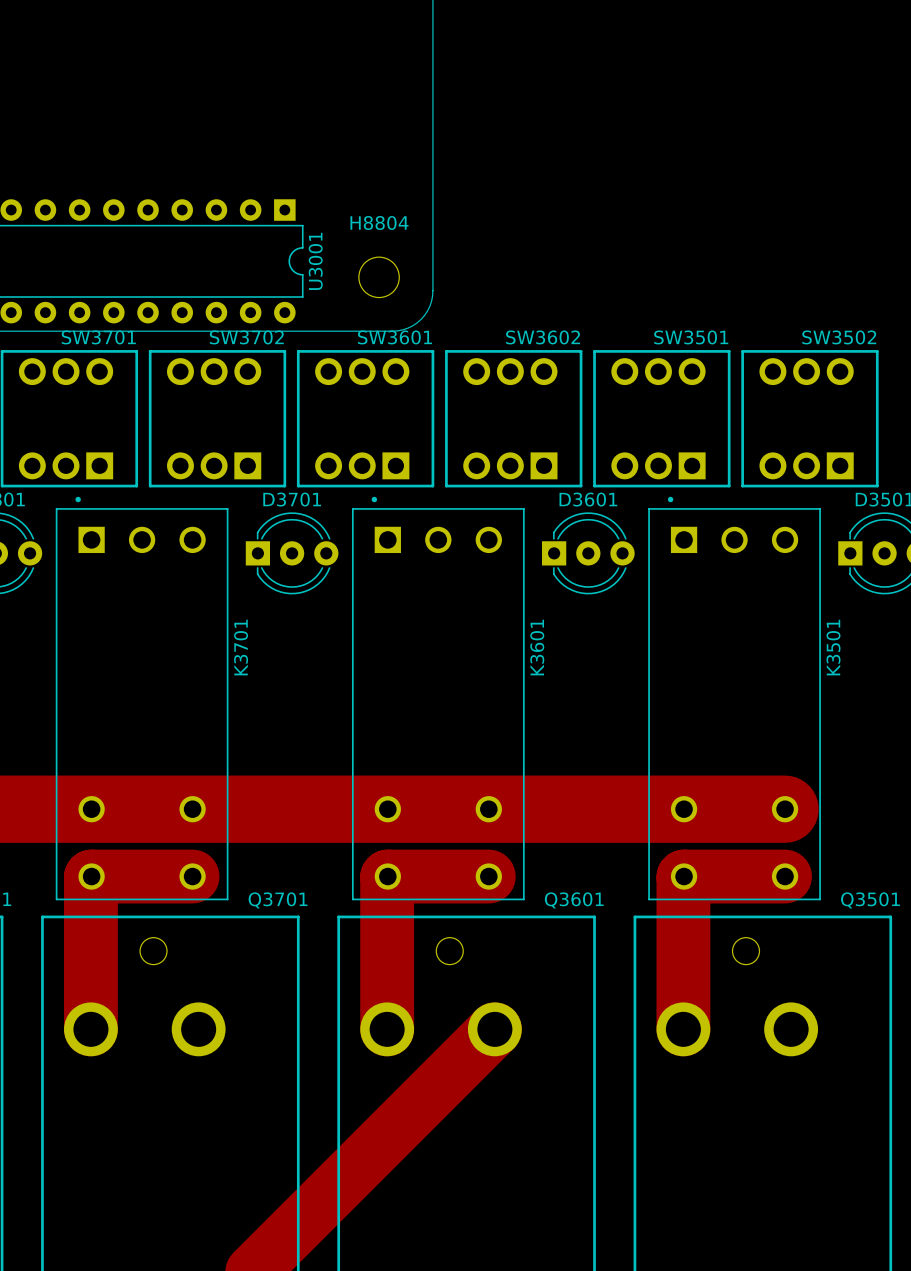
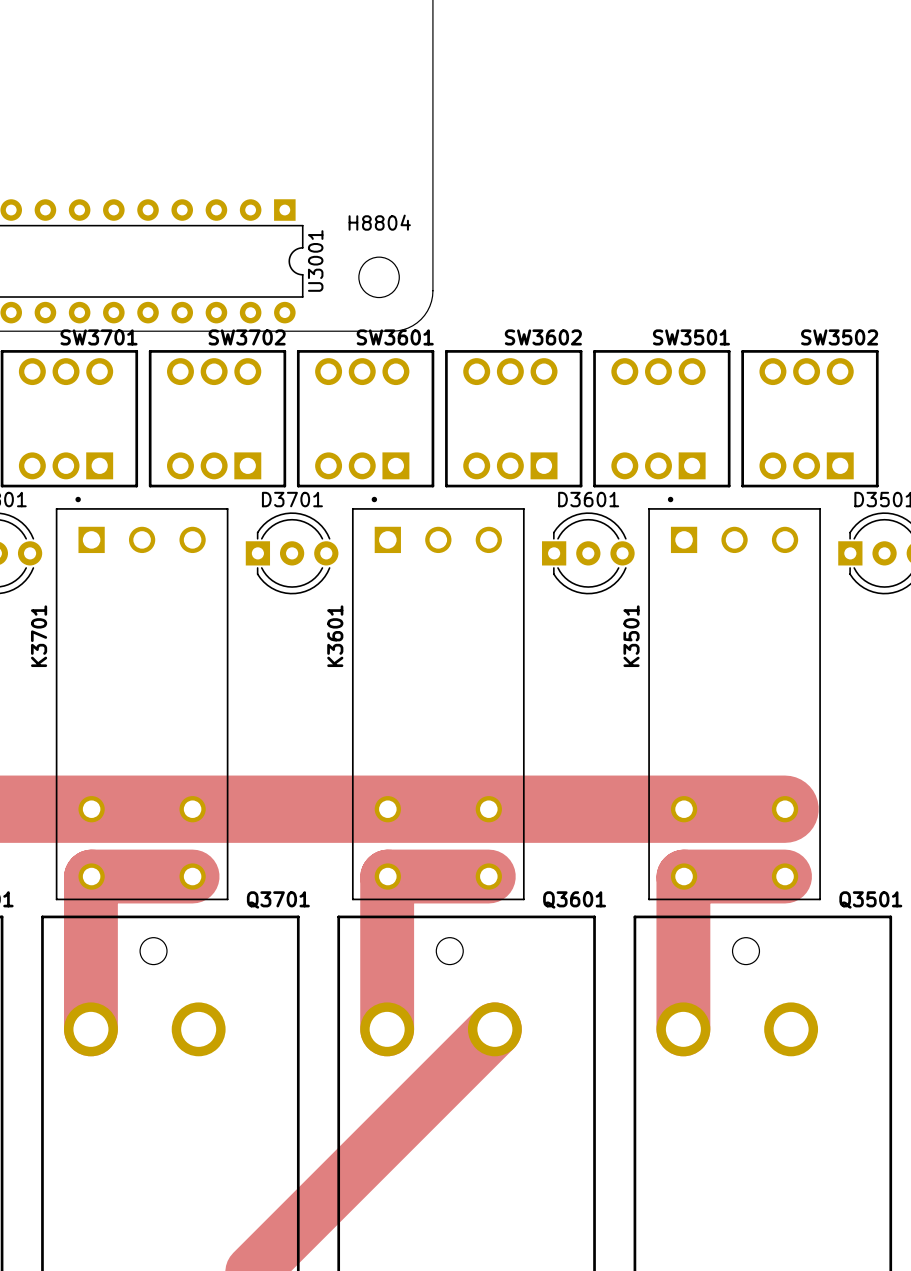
K3701 name position: K3701 (241, 647) -> K3701 (39, 636)
K3601 name position: K3601 (537, 647) -> K3601 (335, 636)
K3501 name position: K3501 (833, 647) -> K3501 (631, 636)

